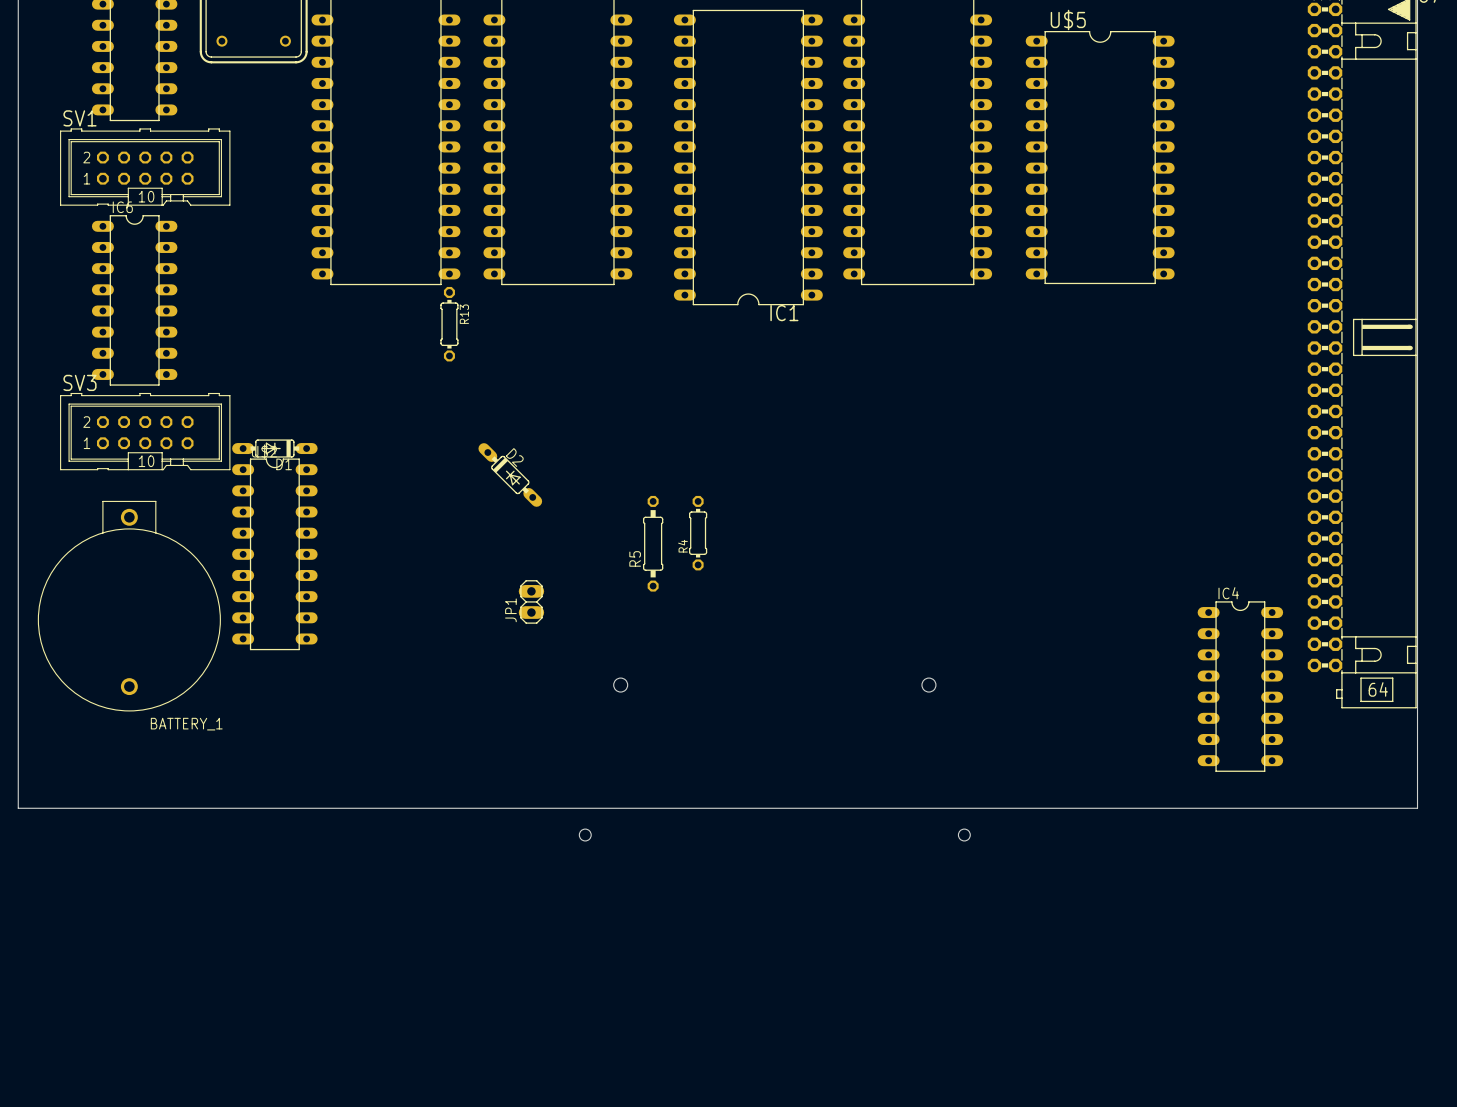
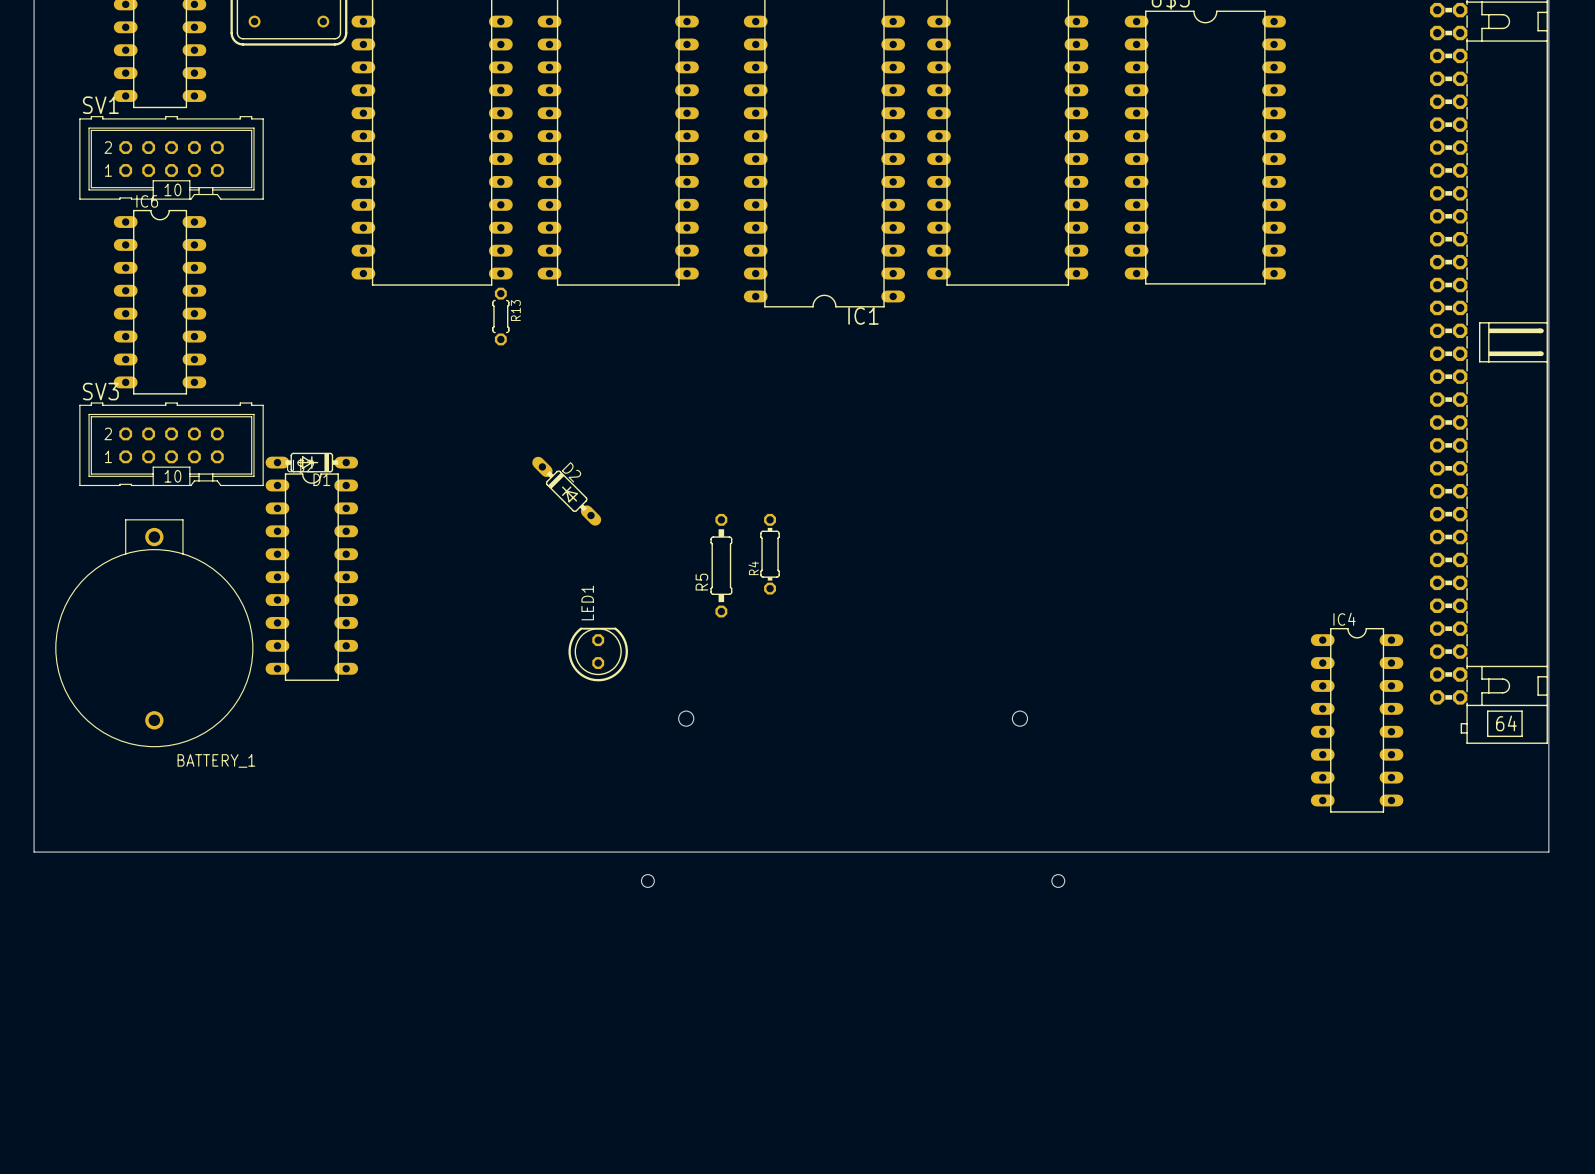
R13 footprint: [440, 286, 459, 362] -> [492, 287, 510, 346]
JP1: (531, 601) -> none
LED1: none -> (598, 654)

